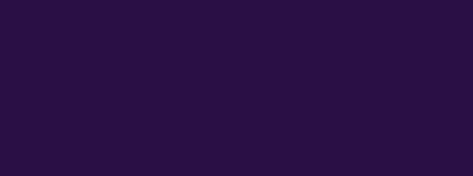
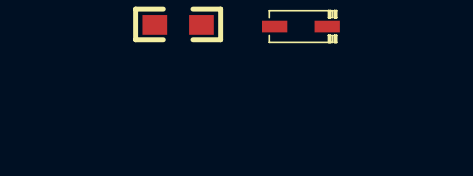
part: none -> (178, 24)
part: none -> (300, 26)

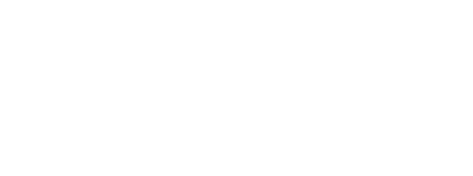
part: (178, 24) -> none
part: (300, 26) -> none

